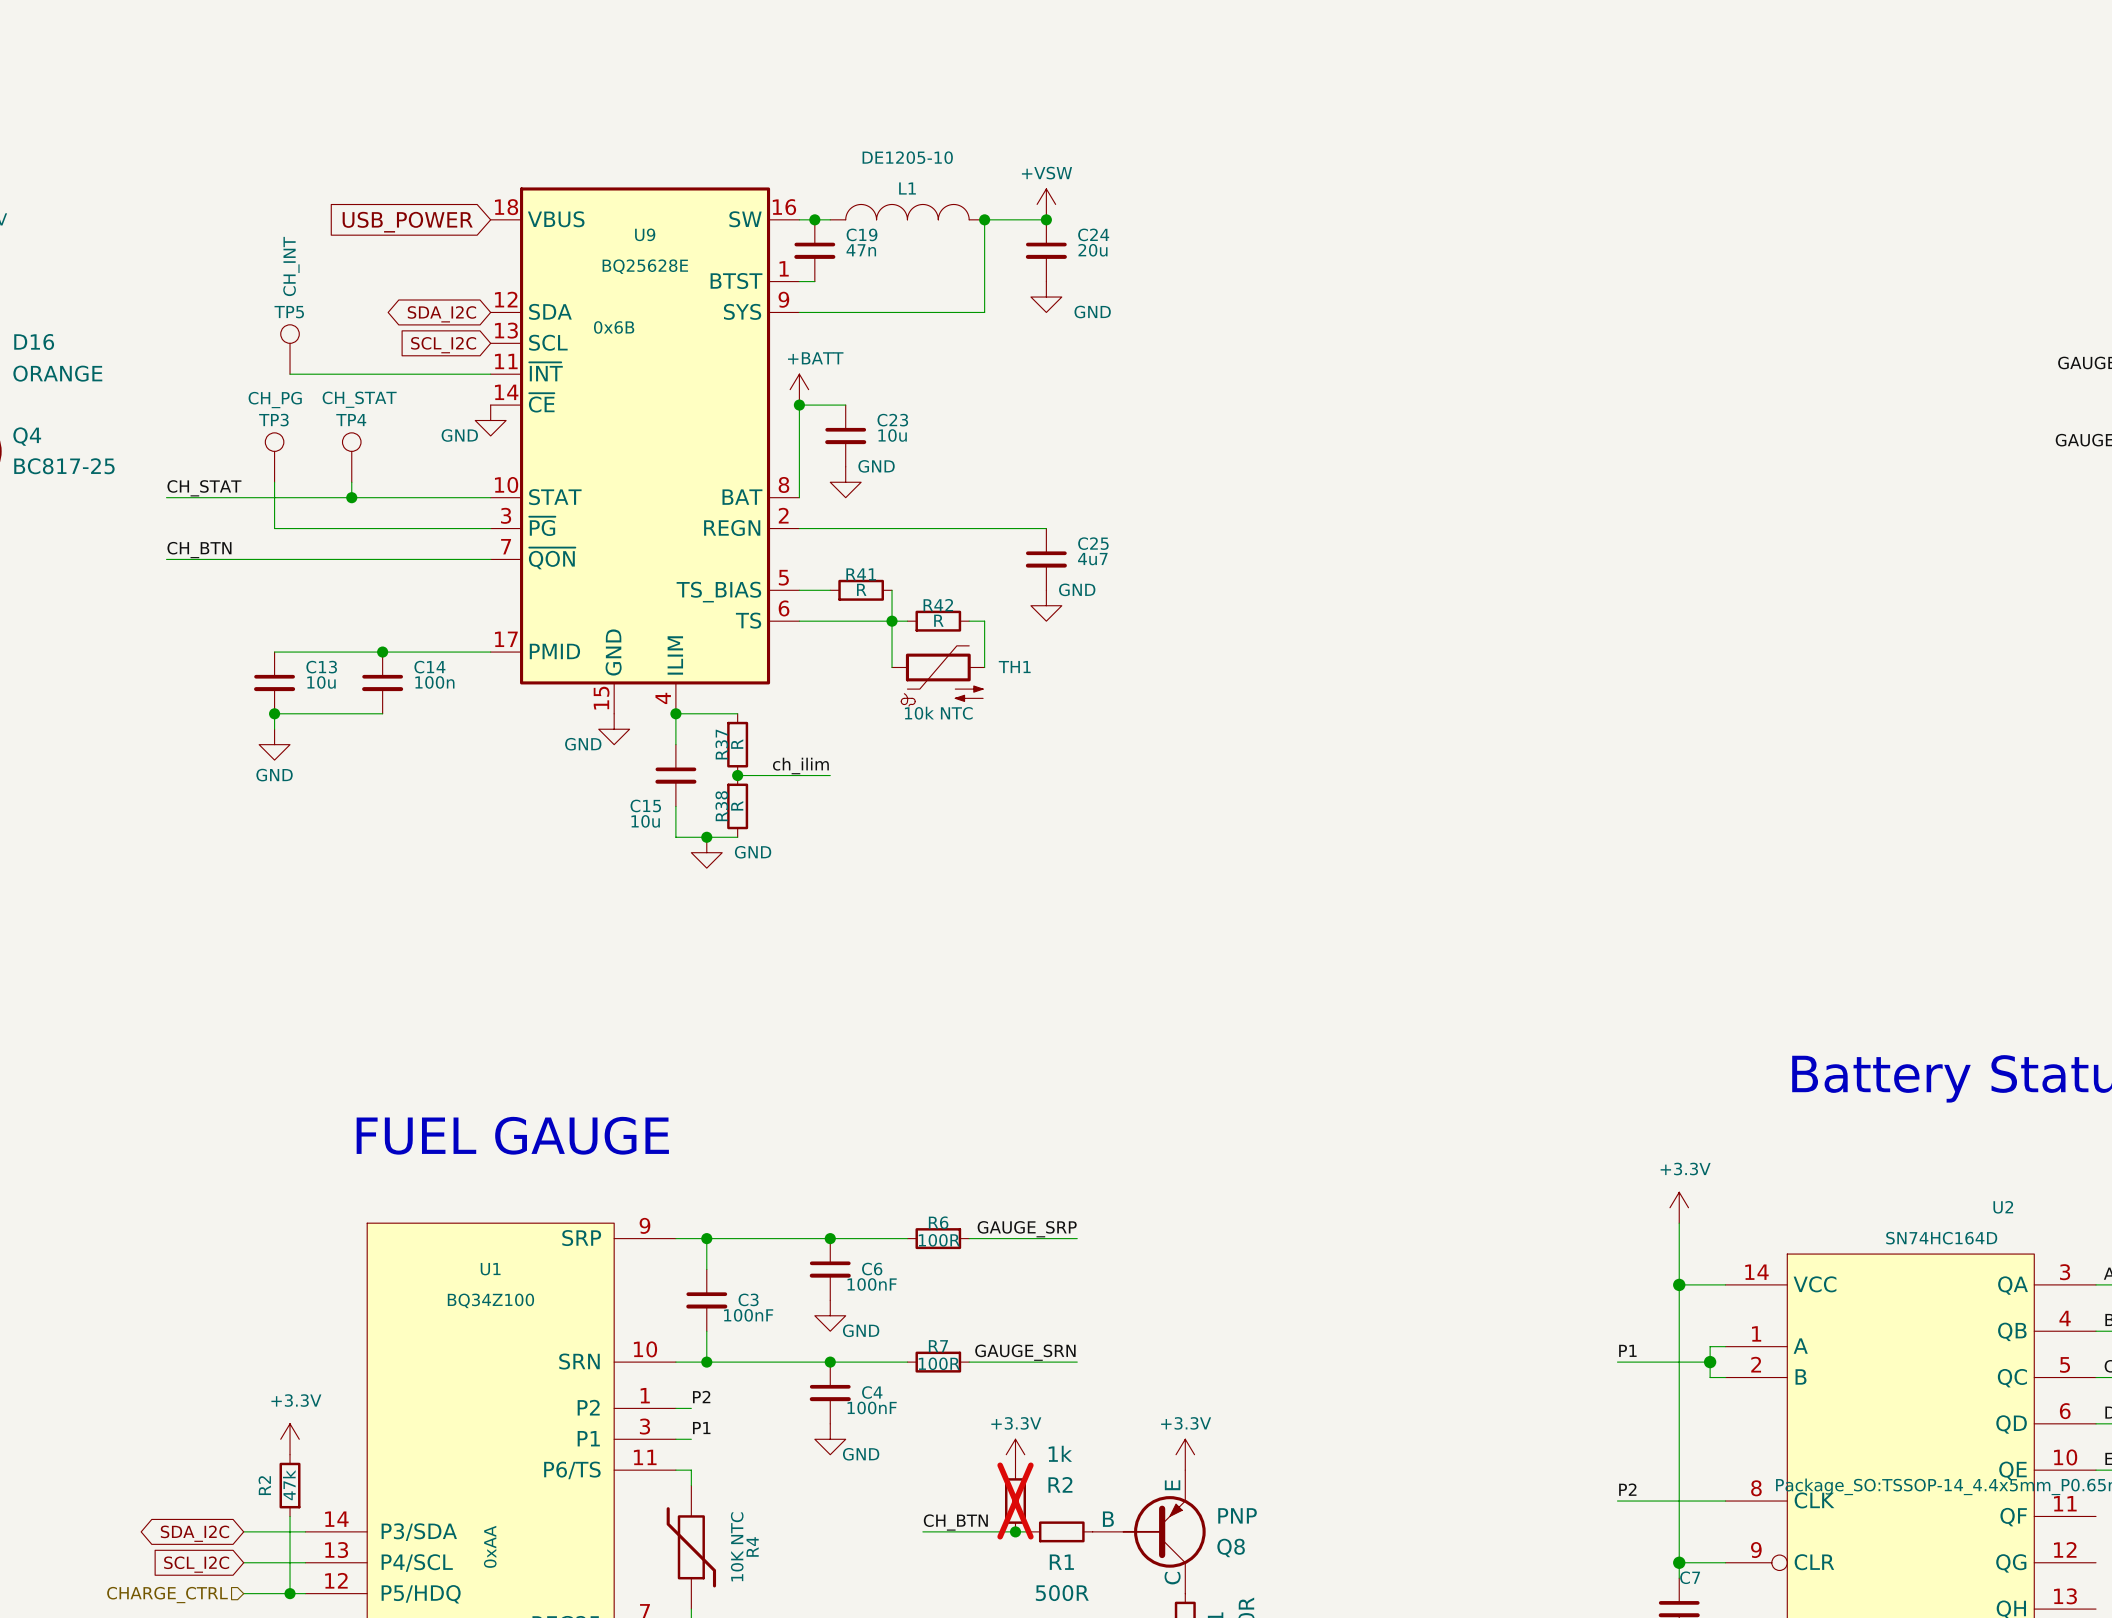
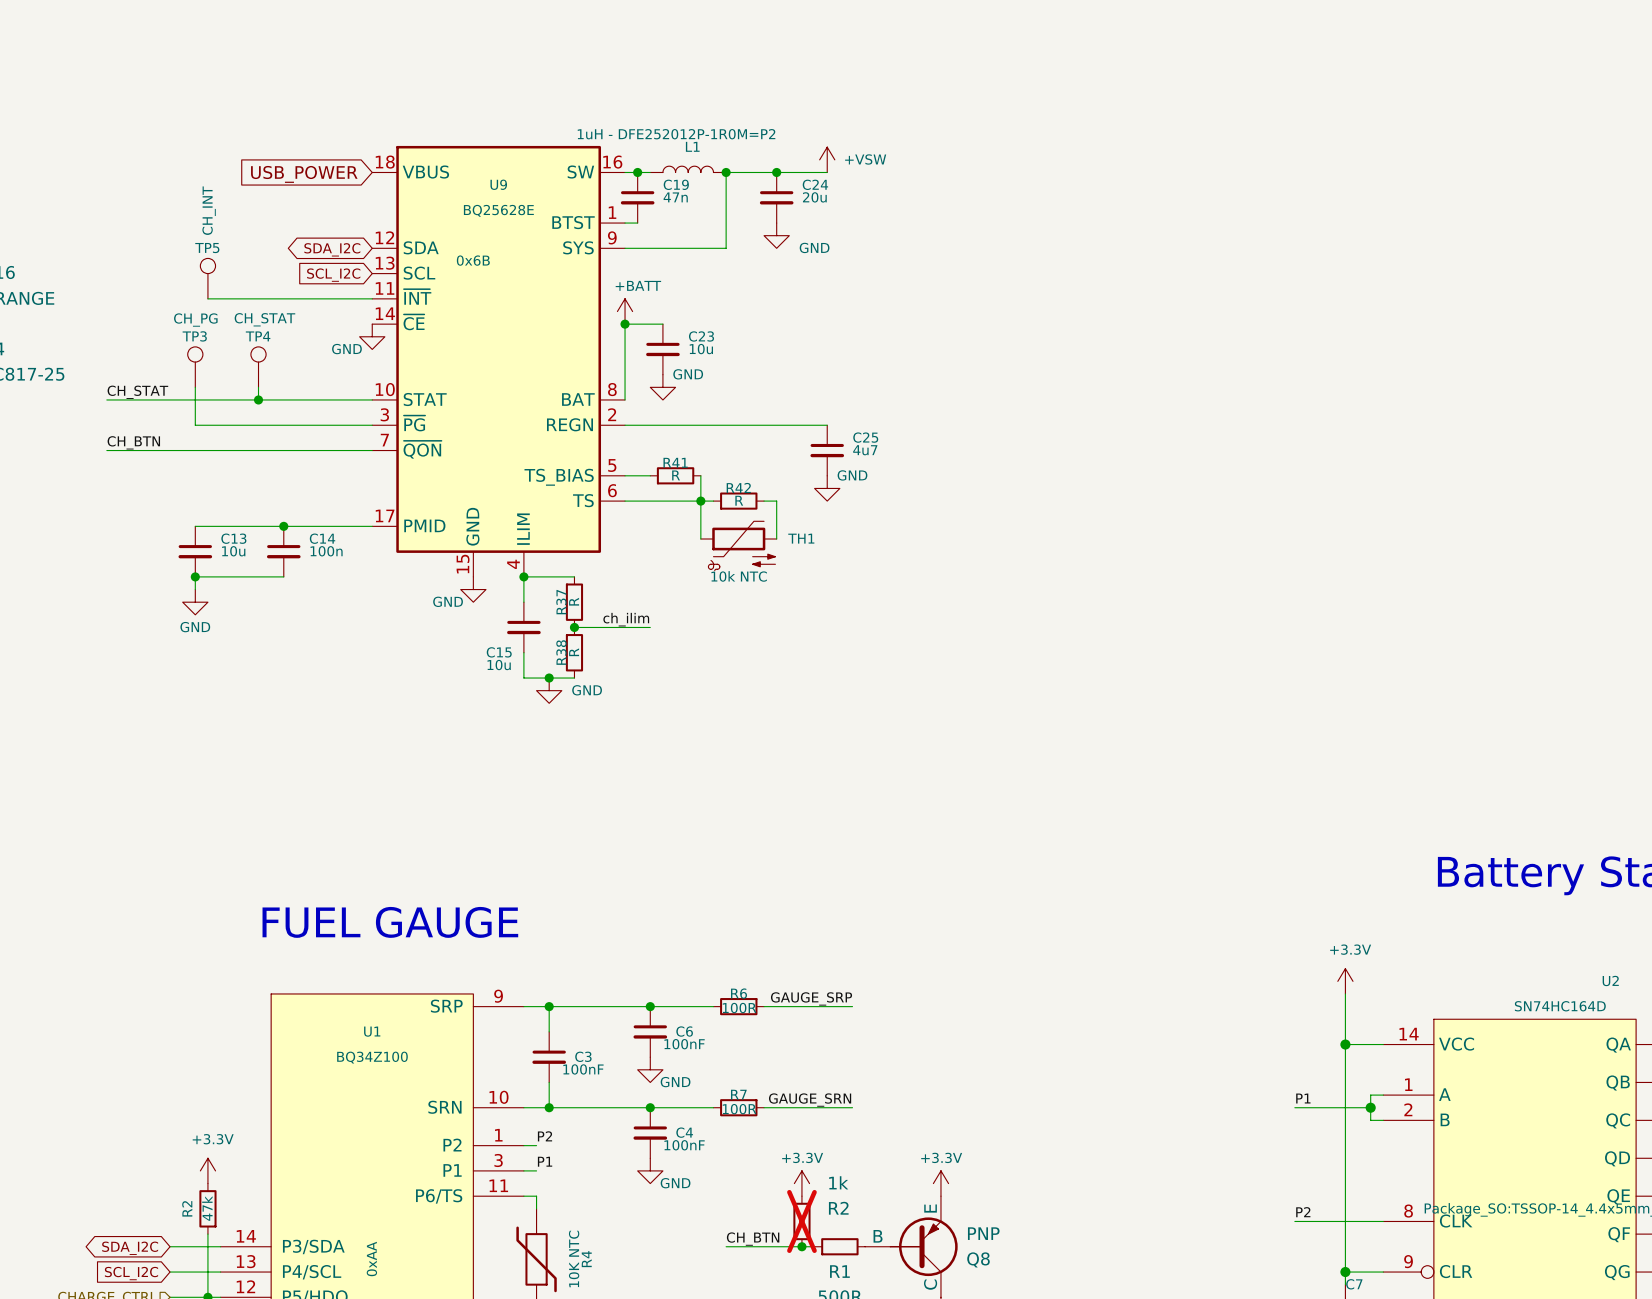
L1 value: DE1205-10 (907, 157) -> 1uH - DFE252012P-1R0M=P2 (676, 134)
power symbol text position: +VSW (1046, 173) -> +VSW (865, 159)
L1 symbol: [830, 204, 985, 220] -> [650, 166, 727, 173]
junction: none -> (726, 172)
wire: (984, 219) (984, 312) (922, 312) -> (776, 172) (726, 172) (726, 248)
junction: (1046, 219) -> none
C24 position: (1046, 250) -> (776, 197)
power symbol position: GND (1046, 297) -> GND (776, 235)

